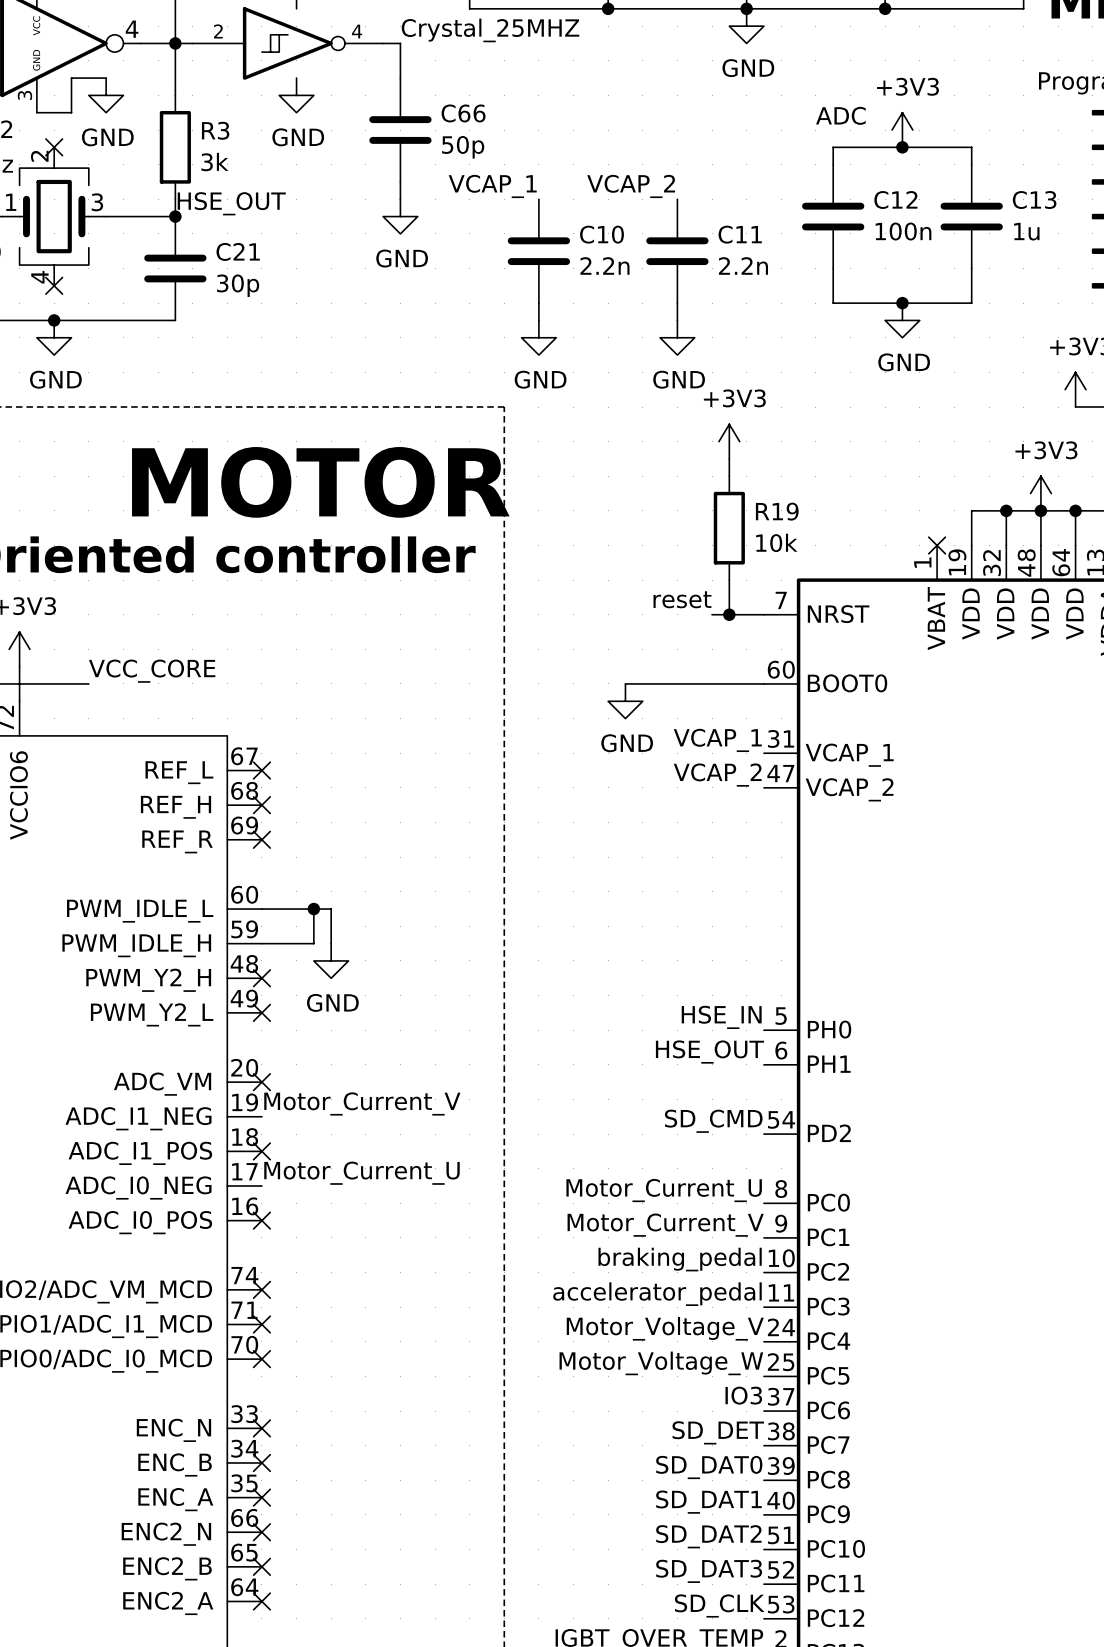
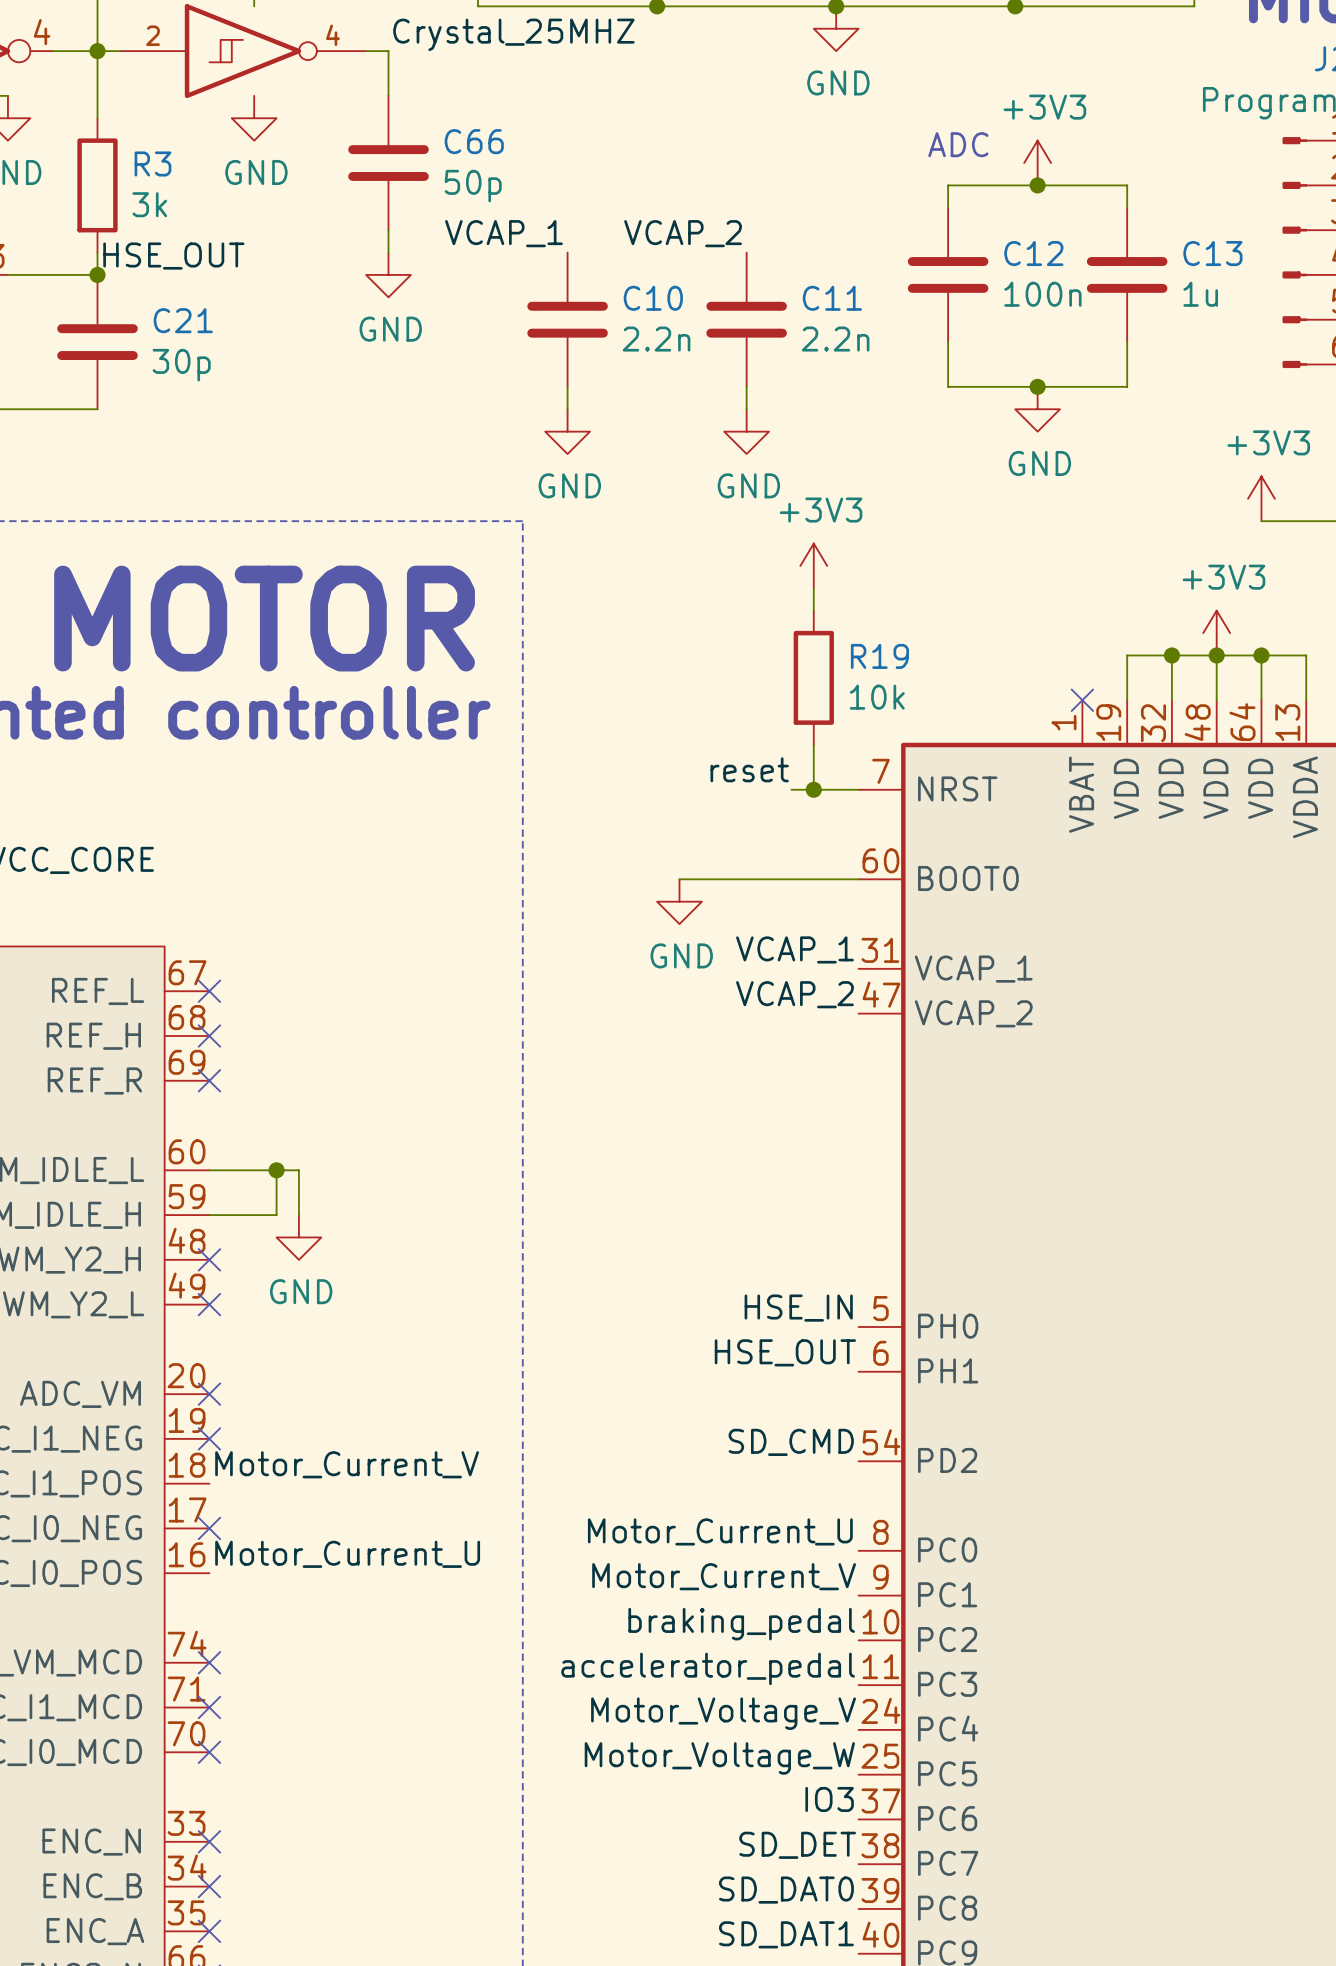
label position: Motor_Current_V (362, 1103) -> Motor_Current_V (347, 1464)
no-connect mark: none -> (209, 1438)
no-connect mark: (261, 1151) -> none
label position: Motor_Current_U (361, 1173) -> Motor_Current_U (347, 1554)
no-connect mark: none -> (209, 1528)
no-connect mark: (261, 1220) -> none

